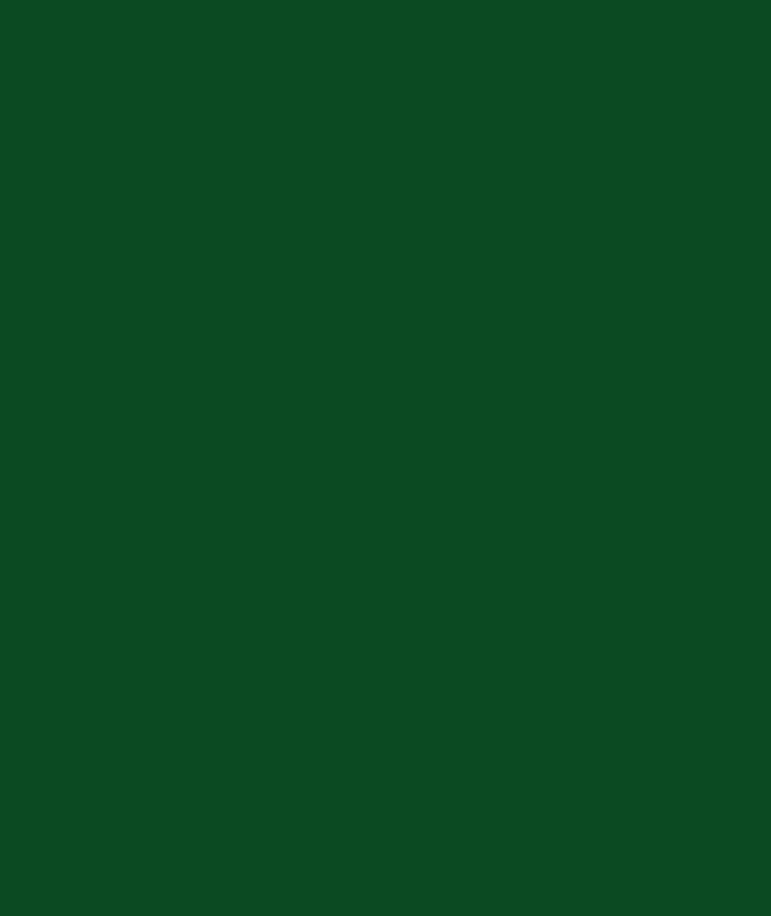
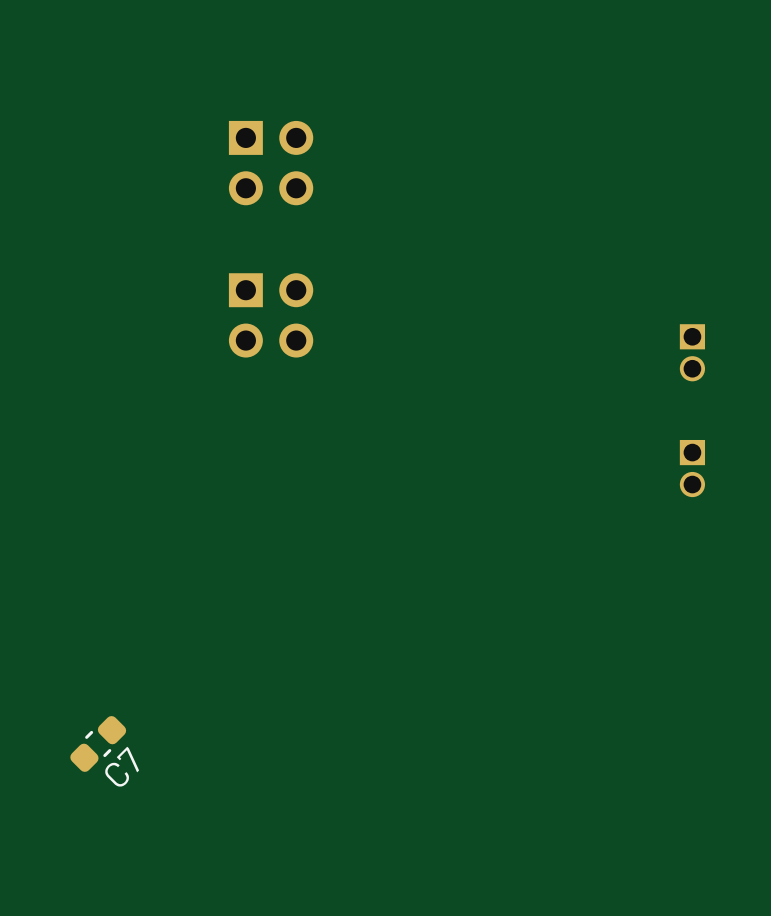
part: none -> (271, 163)
part: none -> (271, 315)
part: none -> (692, 352)
part: none -> (692, 468)
C7: none -> (98, 743)

